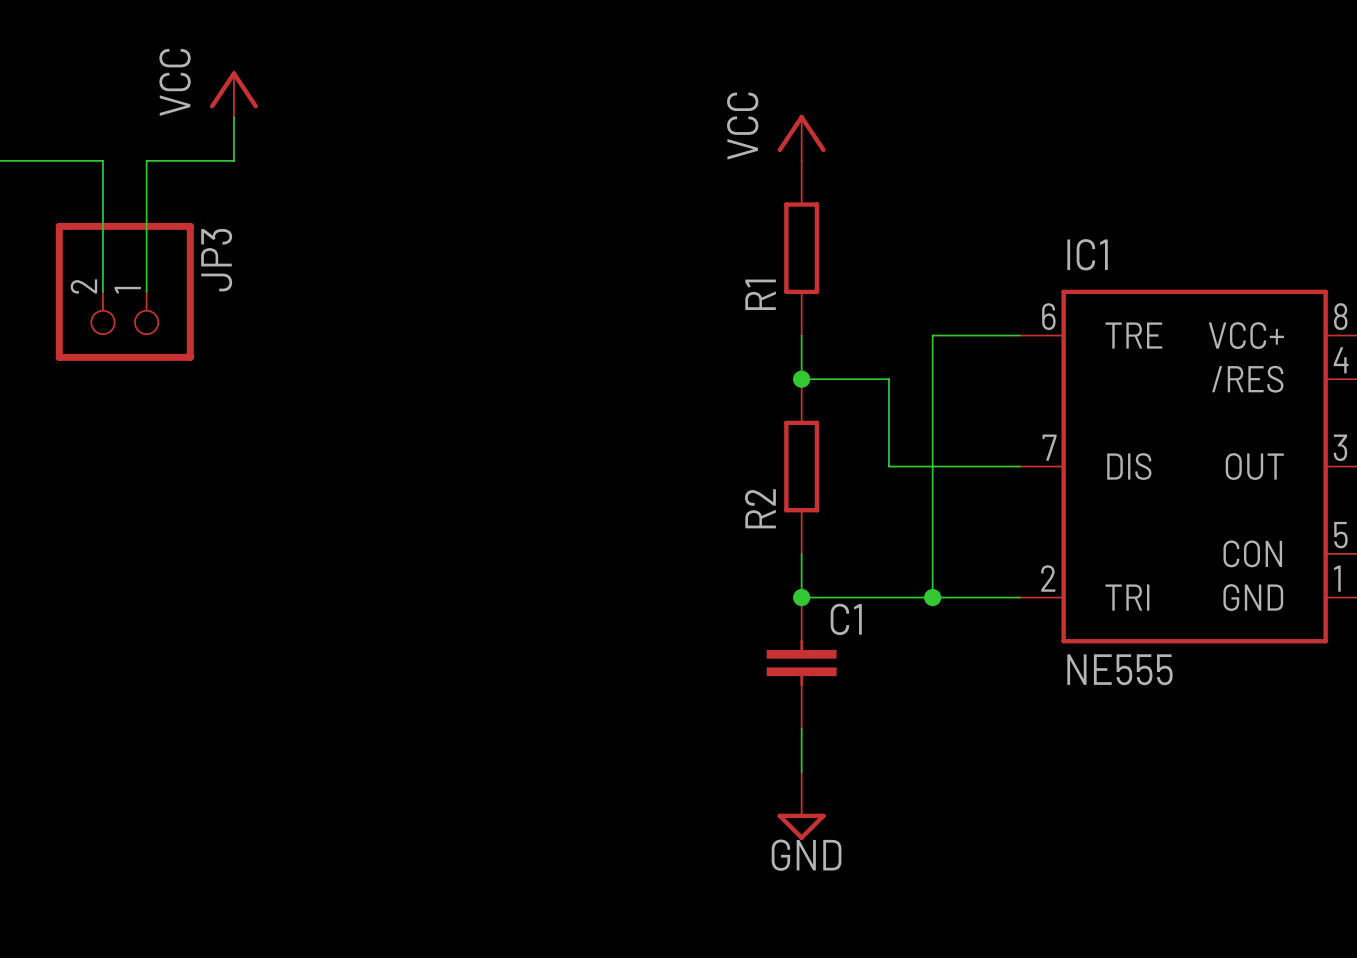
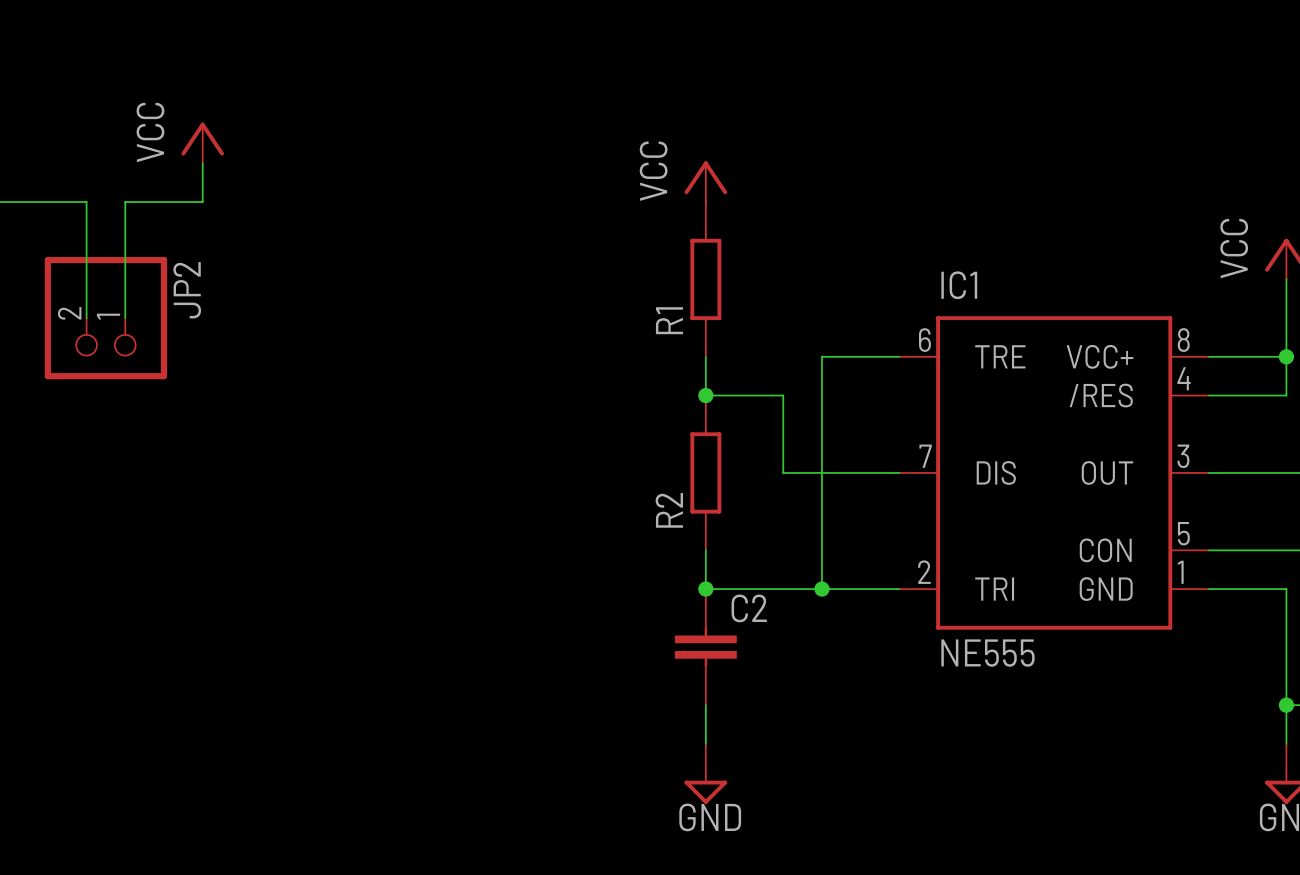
JP3 name: JP3 (216, 260) -> JP2 (187, 290)
C1 name: C1 (846, 619) -> C2 (749, 608)

